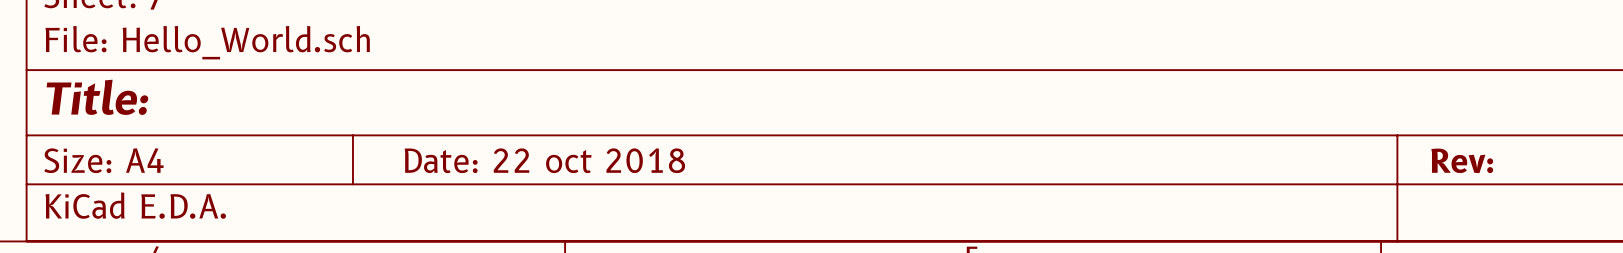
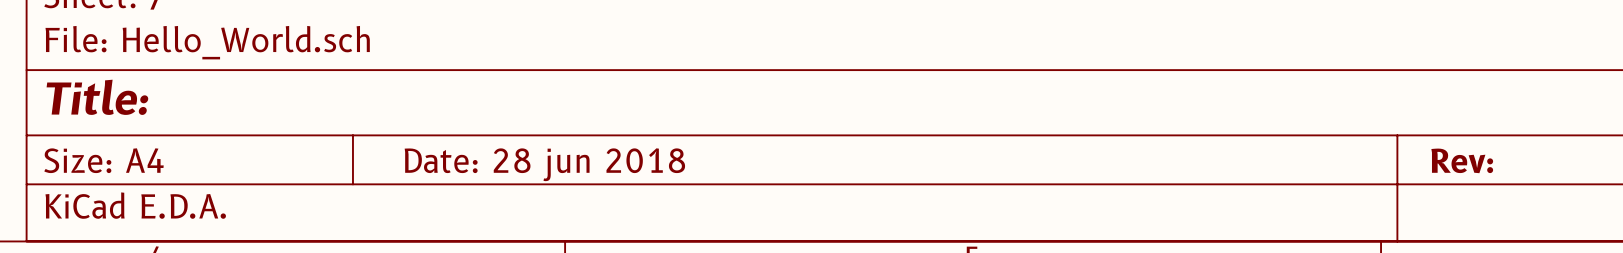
title block: Date: 22 oct 2018 (544, 160) -> Date: 28 jun 2018 (544, 164)

